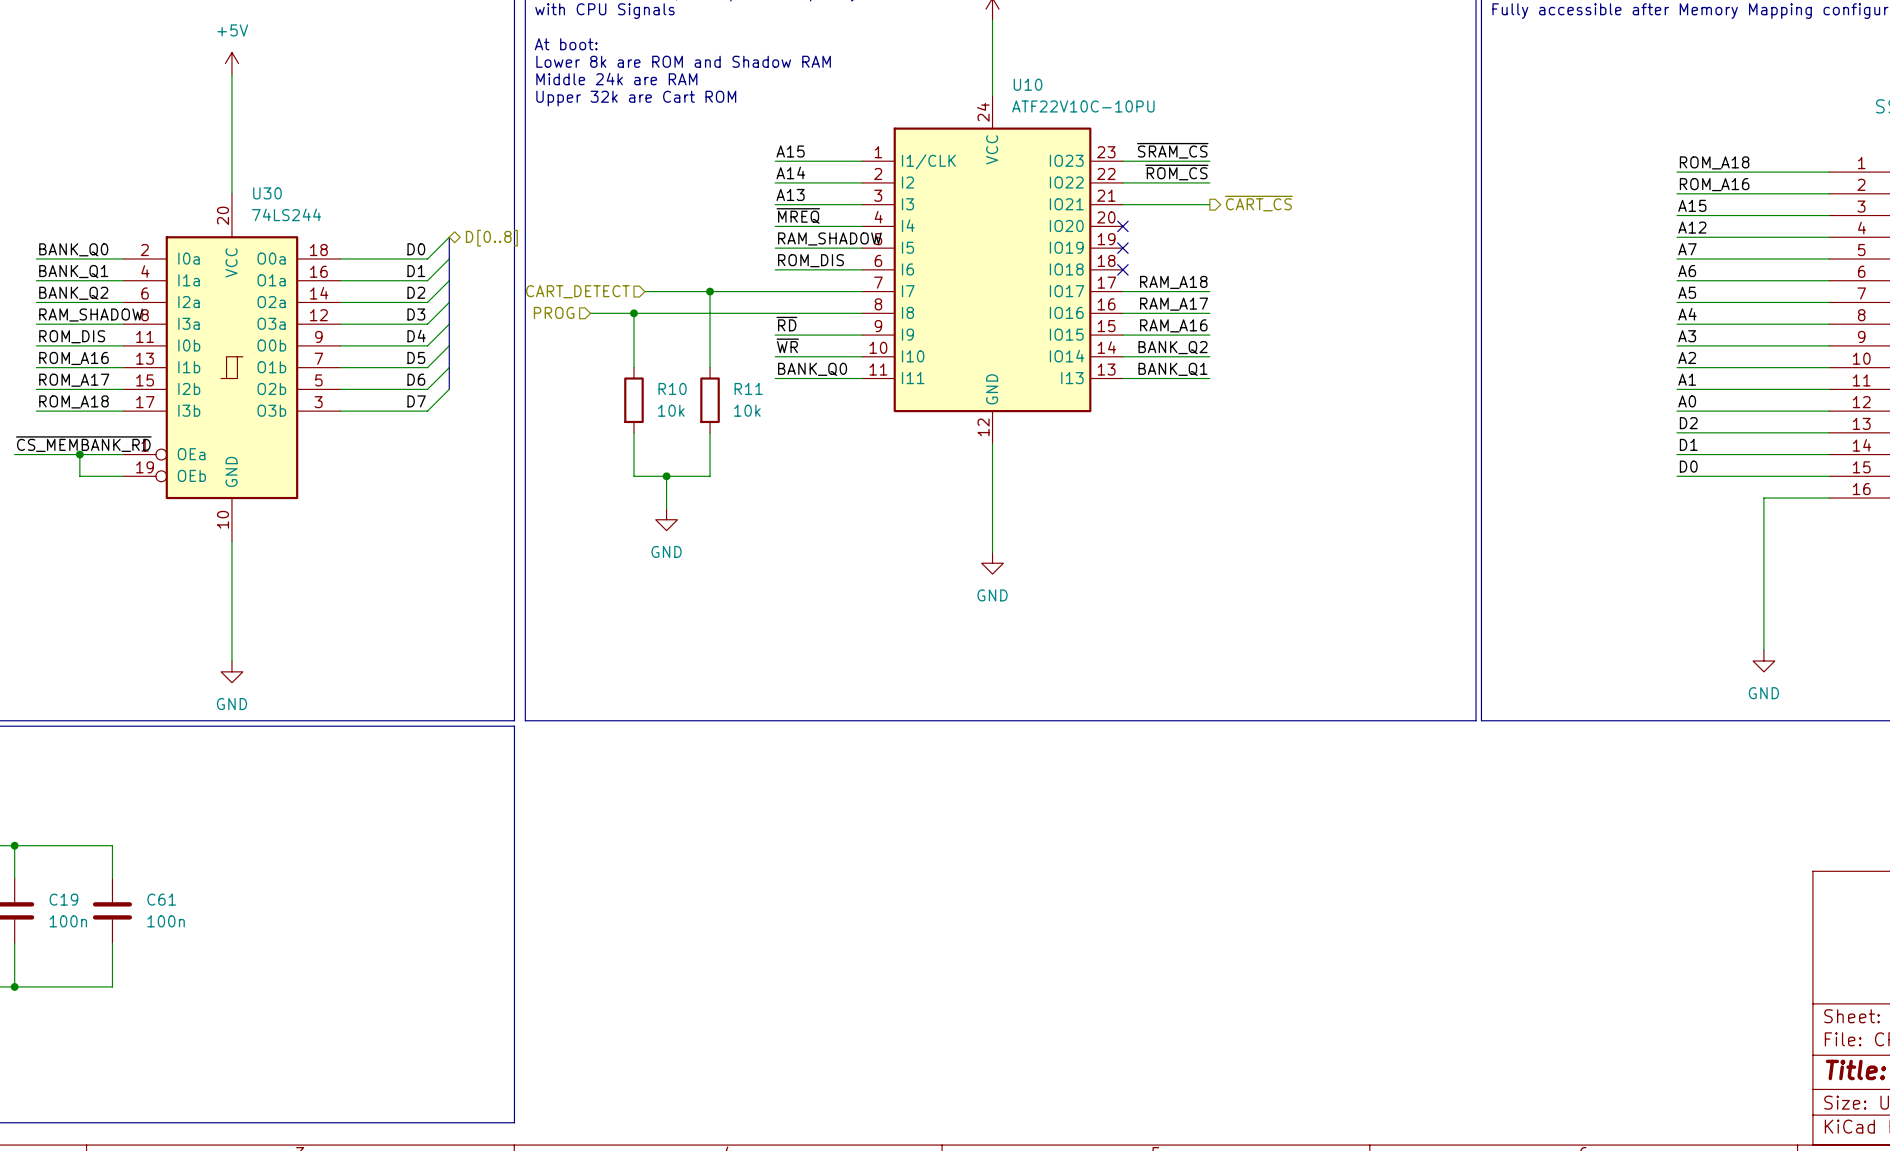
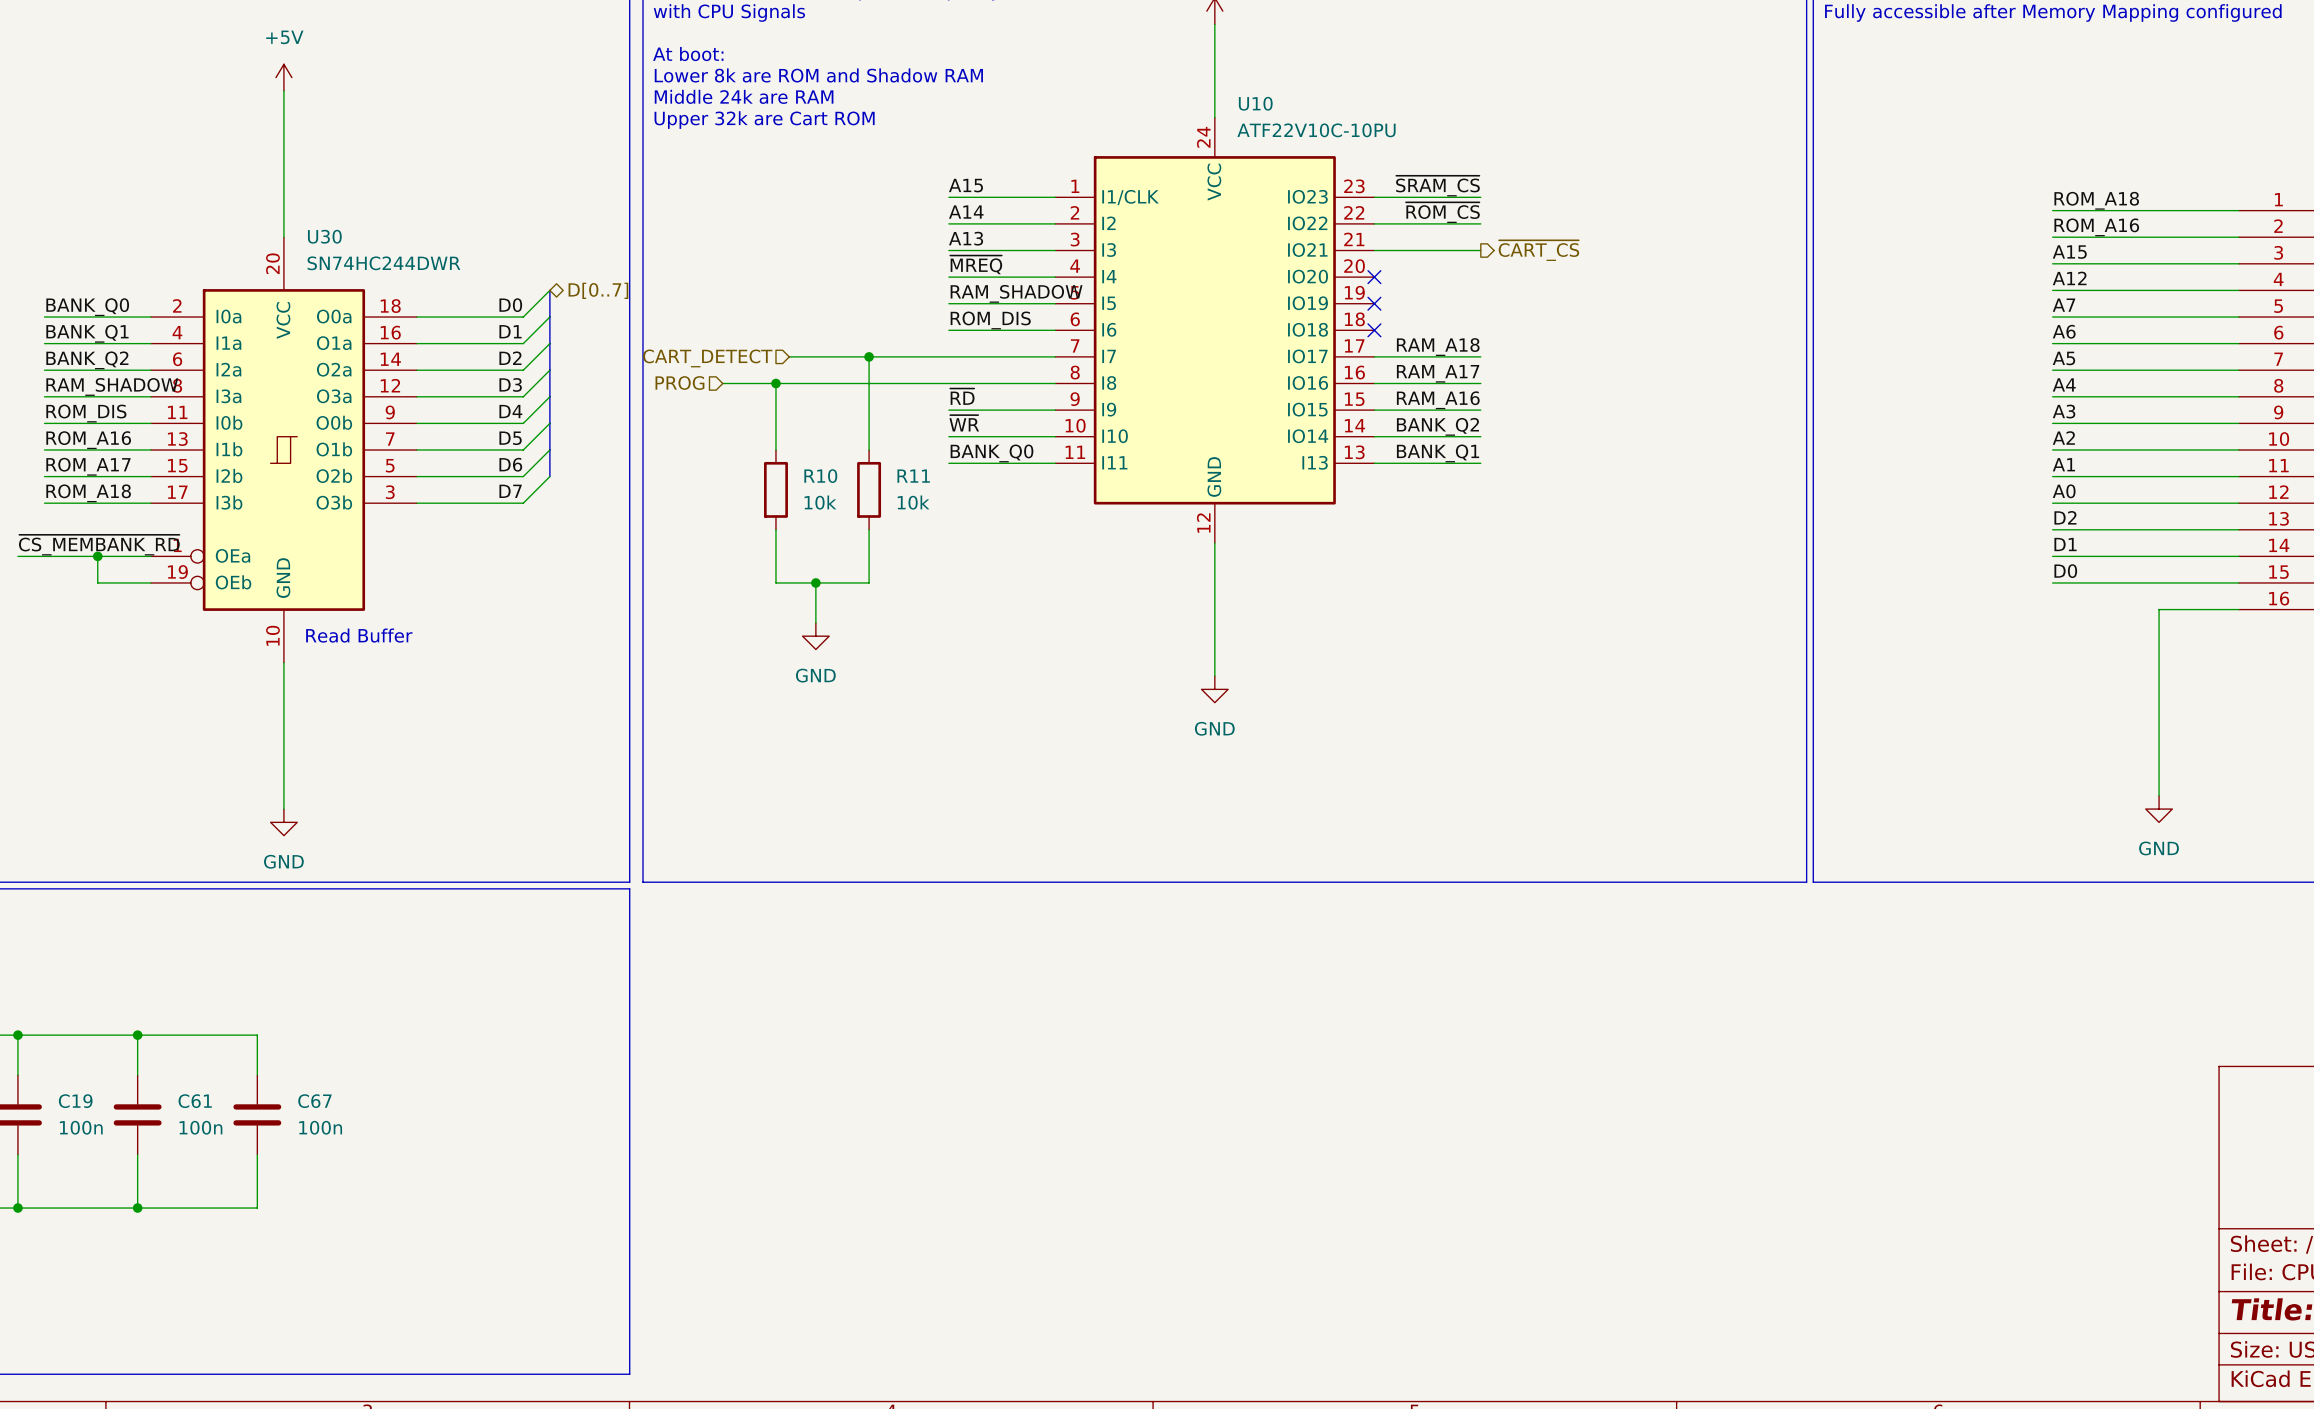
U30 value: 74LS244 (286, 214) -> SN74HC244DWR (383, 263)
hierarchical label: D[0..8] (491, 238) -> D[0..7] (598, 290)
text: none -> Read Buffer (359, 635)
wire: none -> (137, 1035) (257, 1035) (257, 1075)
junction: none -> (137, 1035)
C67: none -> 100n (257, 1114)
wire: none -> (257, 1154) (257, 1208) (137, 1208)
junction: none -> (137, 1208)

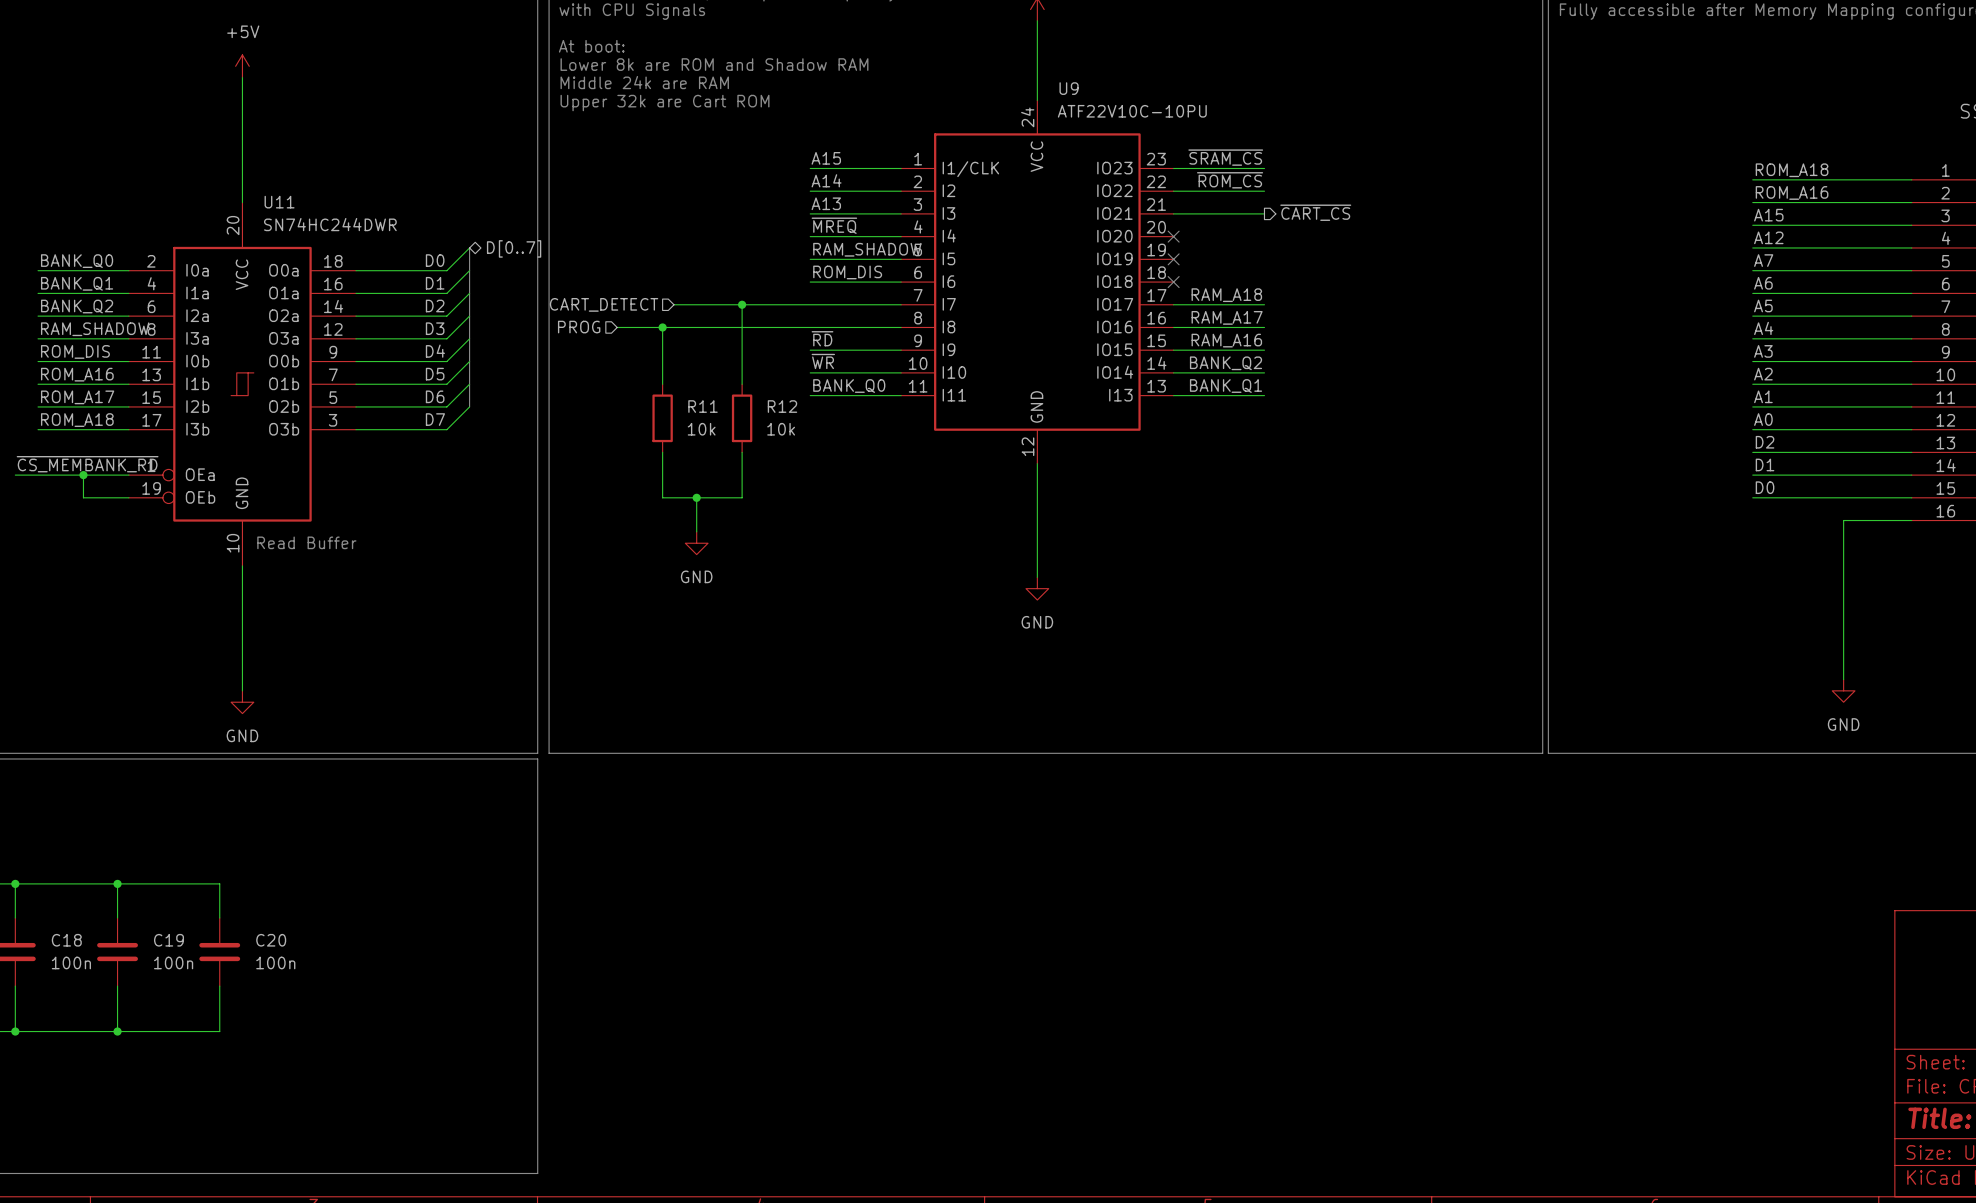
U10 name: U10 (1255, 103) -> U9 (1069, 88)
U30 name: U30 (324, 236) -> U11 (279, 202)
R10 name: R10 (820, 476) -> R11 (702, 406)
R11 name: R11 (913, 476) -> R12 (782, 406)
C19 name: C19 (75, 1101) -> C18 (66, 940)
C61 name: C61 (195, 1101) -> C19 (168, 940)
C67 name: C67 (314, 1101) -> C20 (271, 940)

